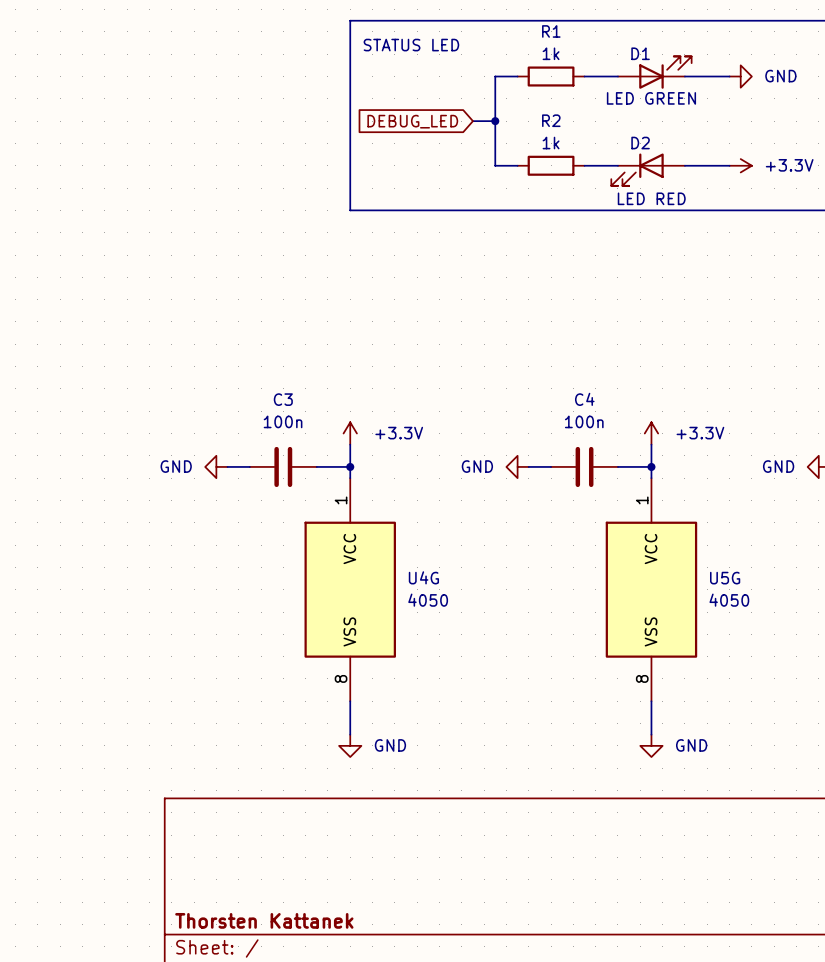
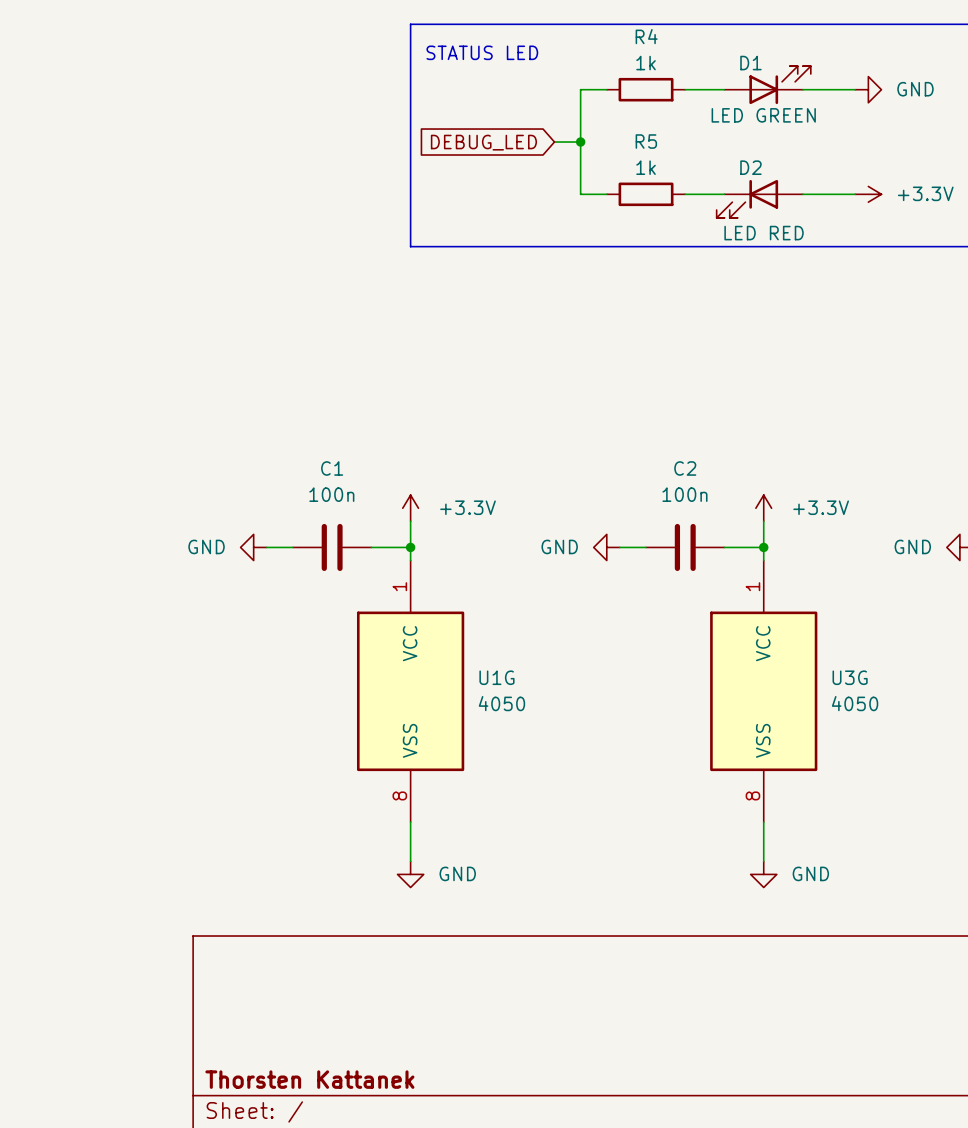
R1 name: R1 (551, 31) -> R4 (646, 36)
R2 name: R2 (551, 120) -> R5 (646, 141)
C3 name: C3 (283, 399) -> C1 (332, 468)
C4 name: C4 (584, 399) -> C2 (685, 468)
U4G name: U4G (423, 577) -> U1G (496, 677)
U5G name: U5G (725, 578) -> U3G (850, 677)

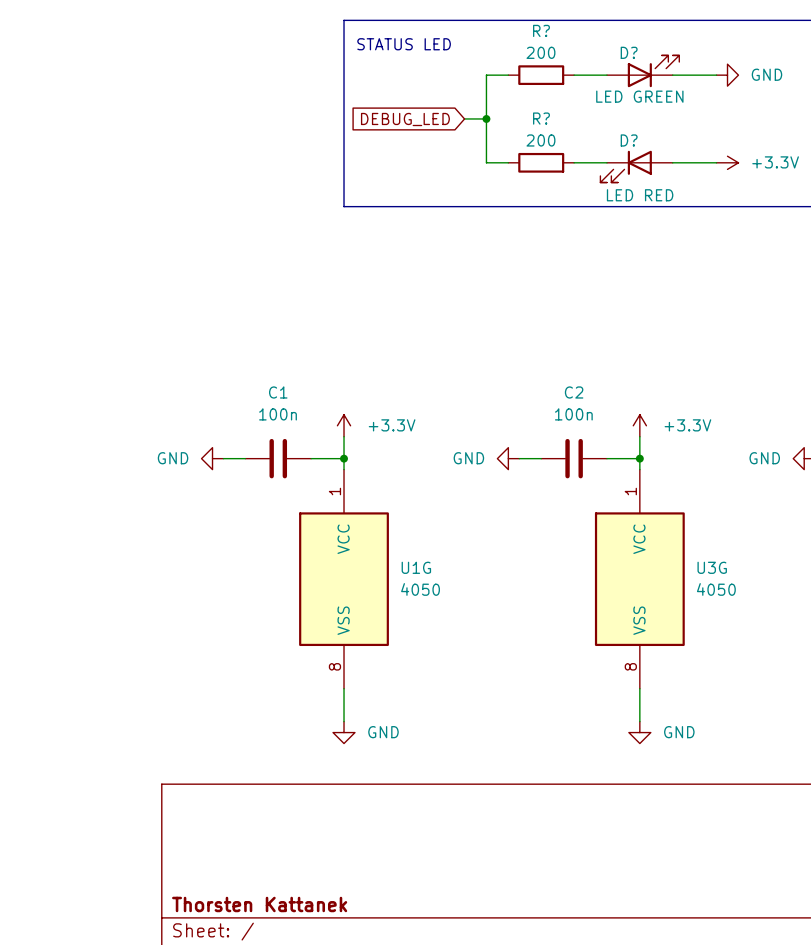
R4 name: R4 (646, 36) -> R? (541, 30)
R4 value: 1k (646, 63) -> 200 (540, 52)
D1 name: D1 (750, 63) -> D? (629, 52)
R5 name: R5 (646, 141) -> R? (541, 118)
R5 value: 1k (646, 167) -> 200 (540, 140)
D2 name: D2 (750, 167) -> D? (629, 140)

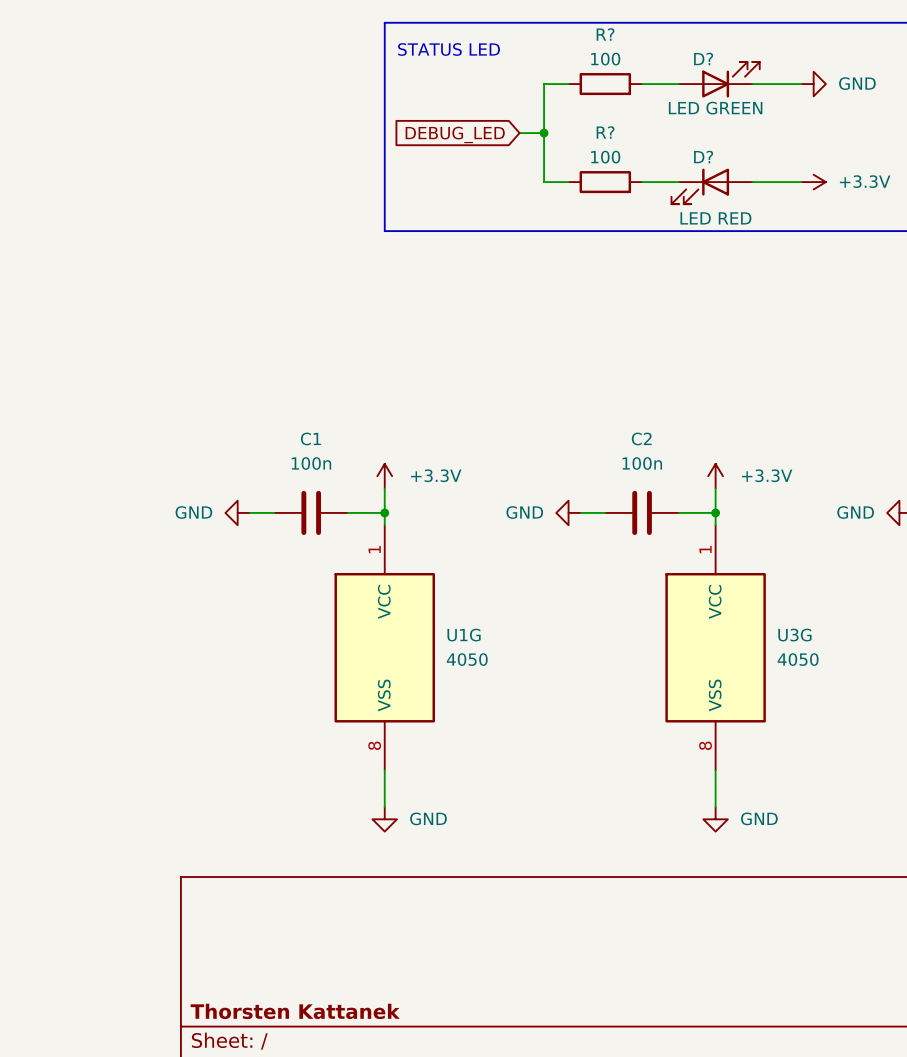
R? value: 200 (540, 52) -> 100 (605, 59)
R? value: 200 (540, 140) -> 100 (605, 157)

